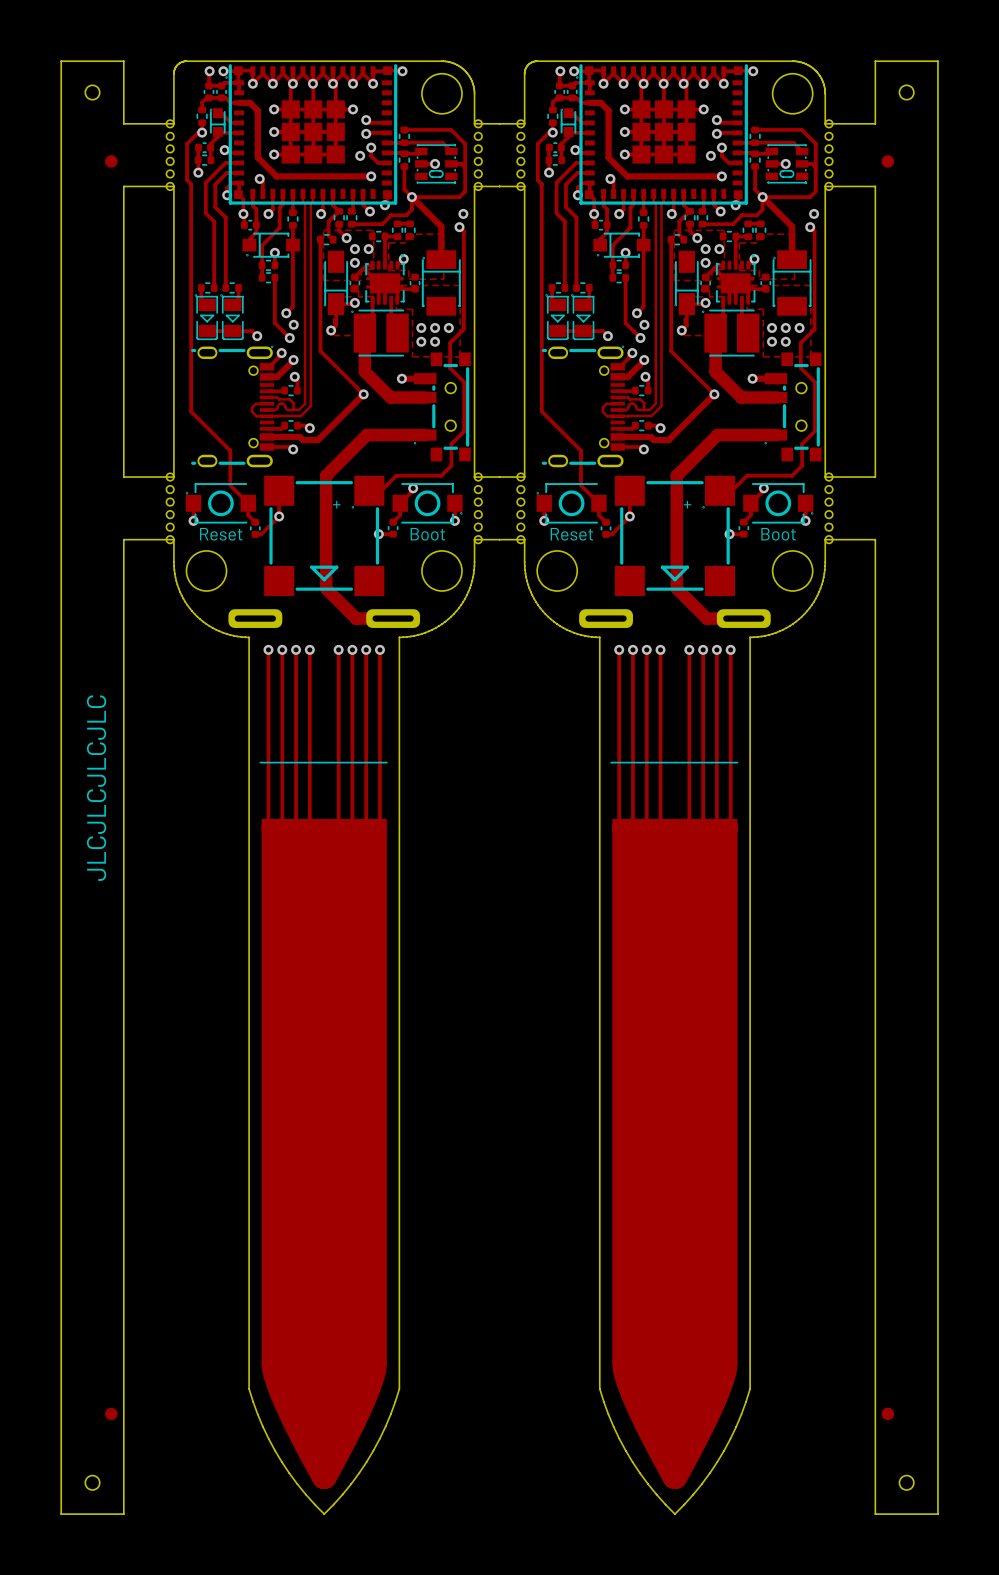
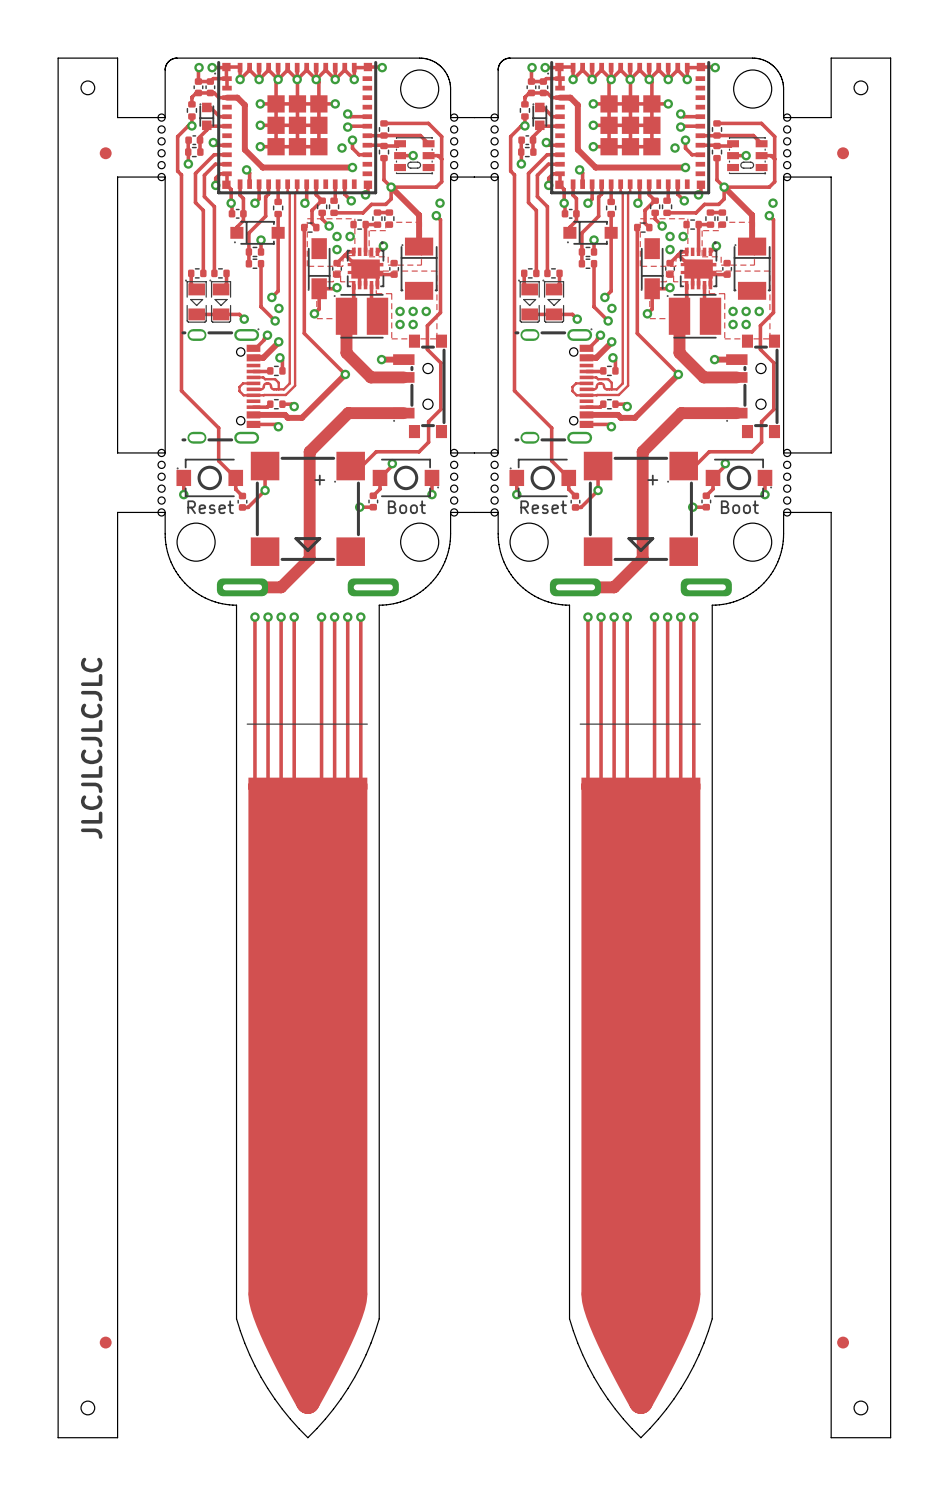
track: (326, 588) (356, 618) (393, 618) -> (309, 558) (281, 587) (242, 587)
track: (676, 588) (706, 618) (743, 618) -> (642, 558) (614, 587) (575, 587)

